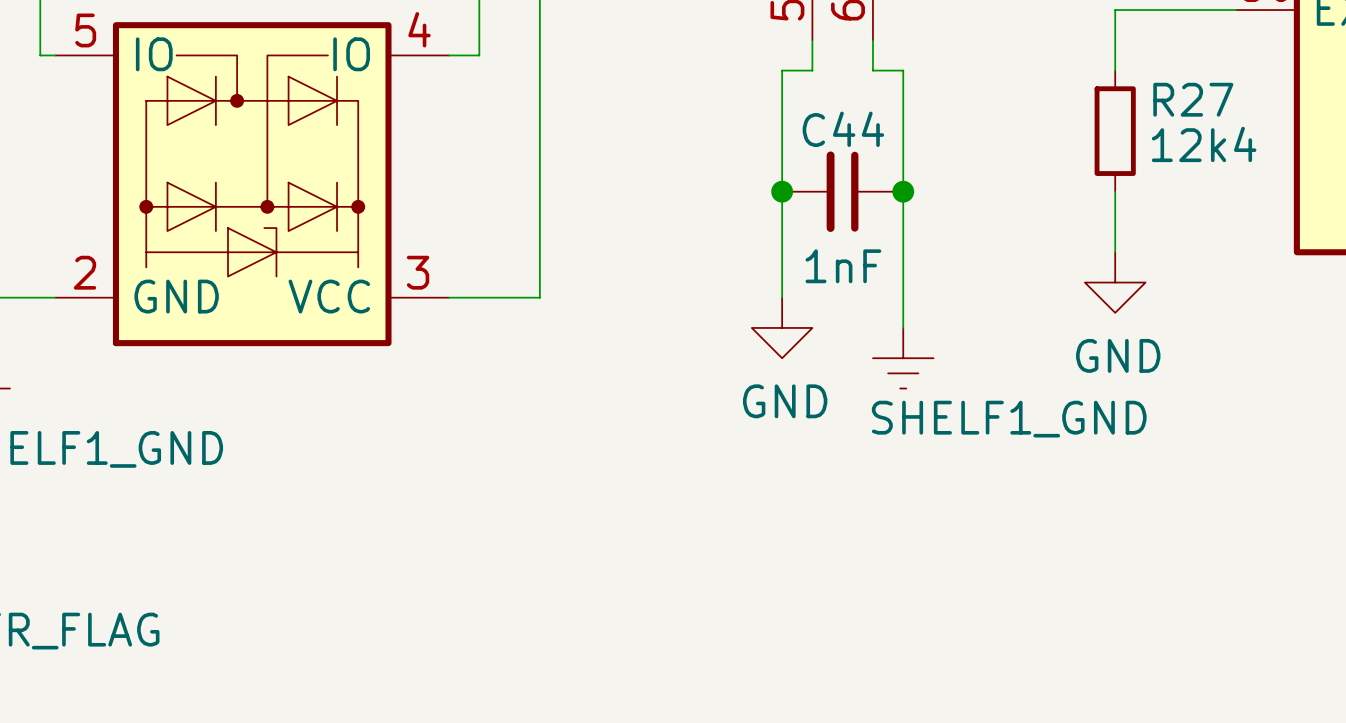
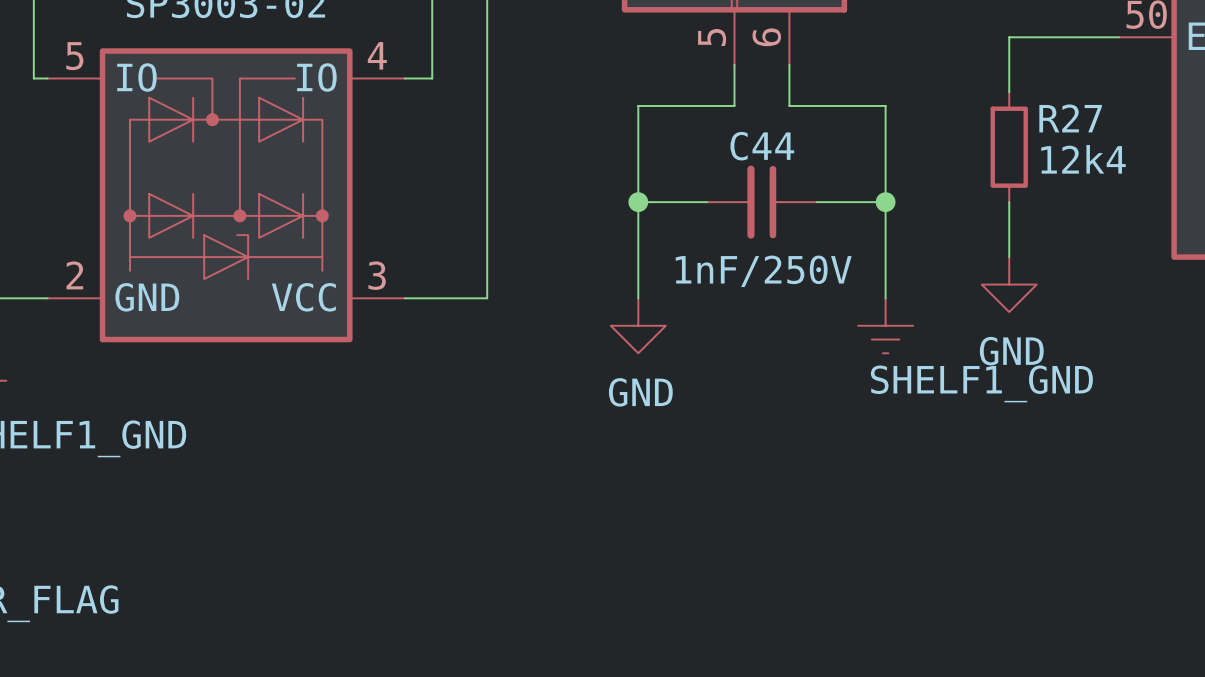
wire: (812, 70) (782, 70) (782, 297) -> (734, 92) (734, 105) (638, 105) (638, 298)
wire: (872, 70) (903, 70) (903, 327) -> (789, 92) (789, 105) (885, 105) (885, 298)
wire: none -> (638, 202) (707, 202)
junction position: (782, 191) -> (638, 202)
wire: none -> (816, 202) (885, 202)
junction position: (903, 191) -> (885, 202)
C44 value: 1nF (843, 266) -> 1nF/250V (763, 271)
power symbol position: GND (782, 327) -> GND (638, 325)
power symbol position: SHELF1_GND (903, 358) -> SHELF1_GND (885, 325)

